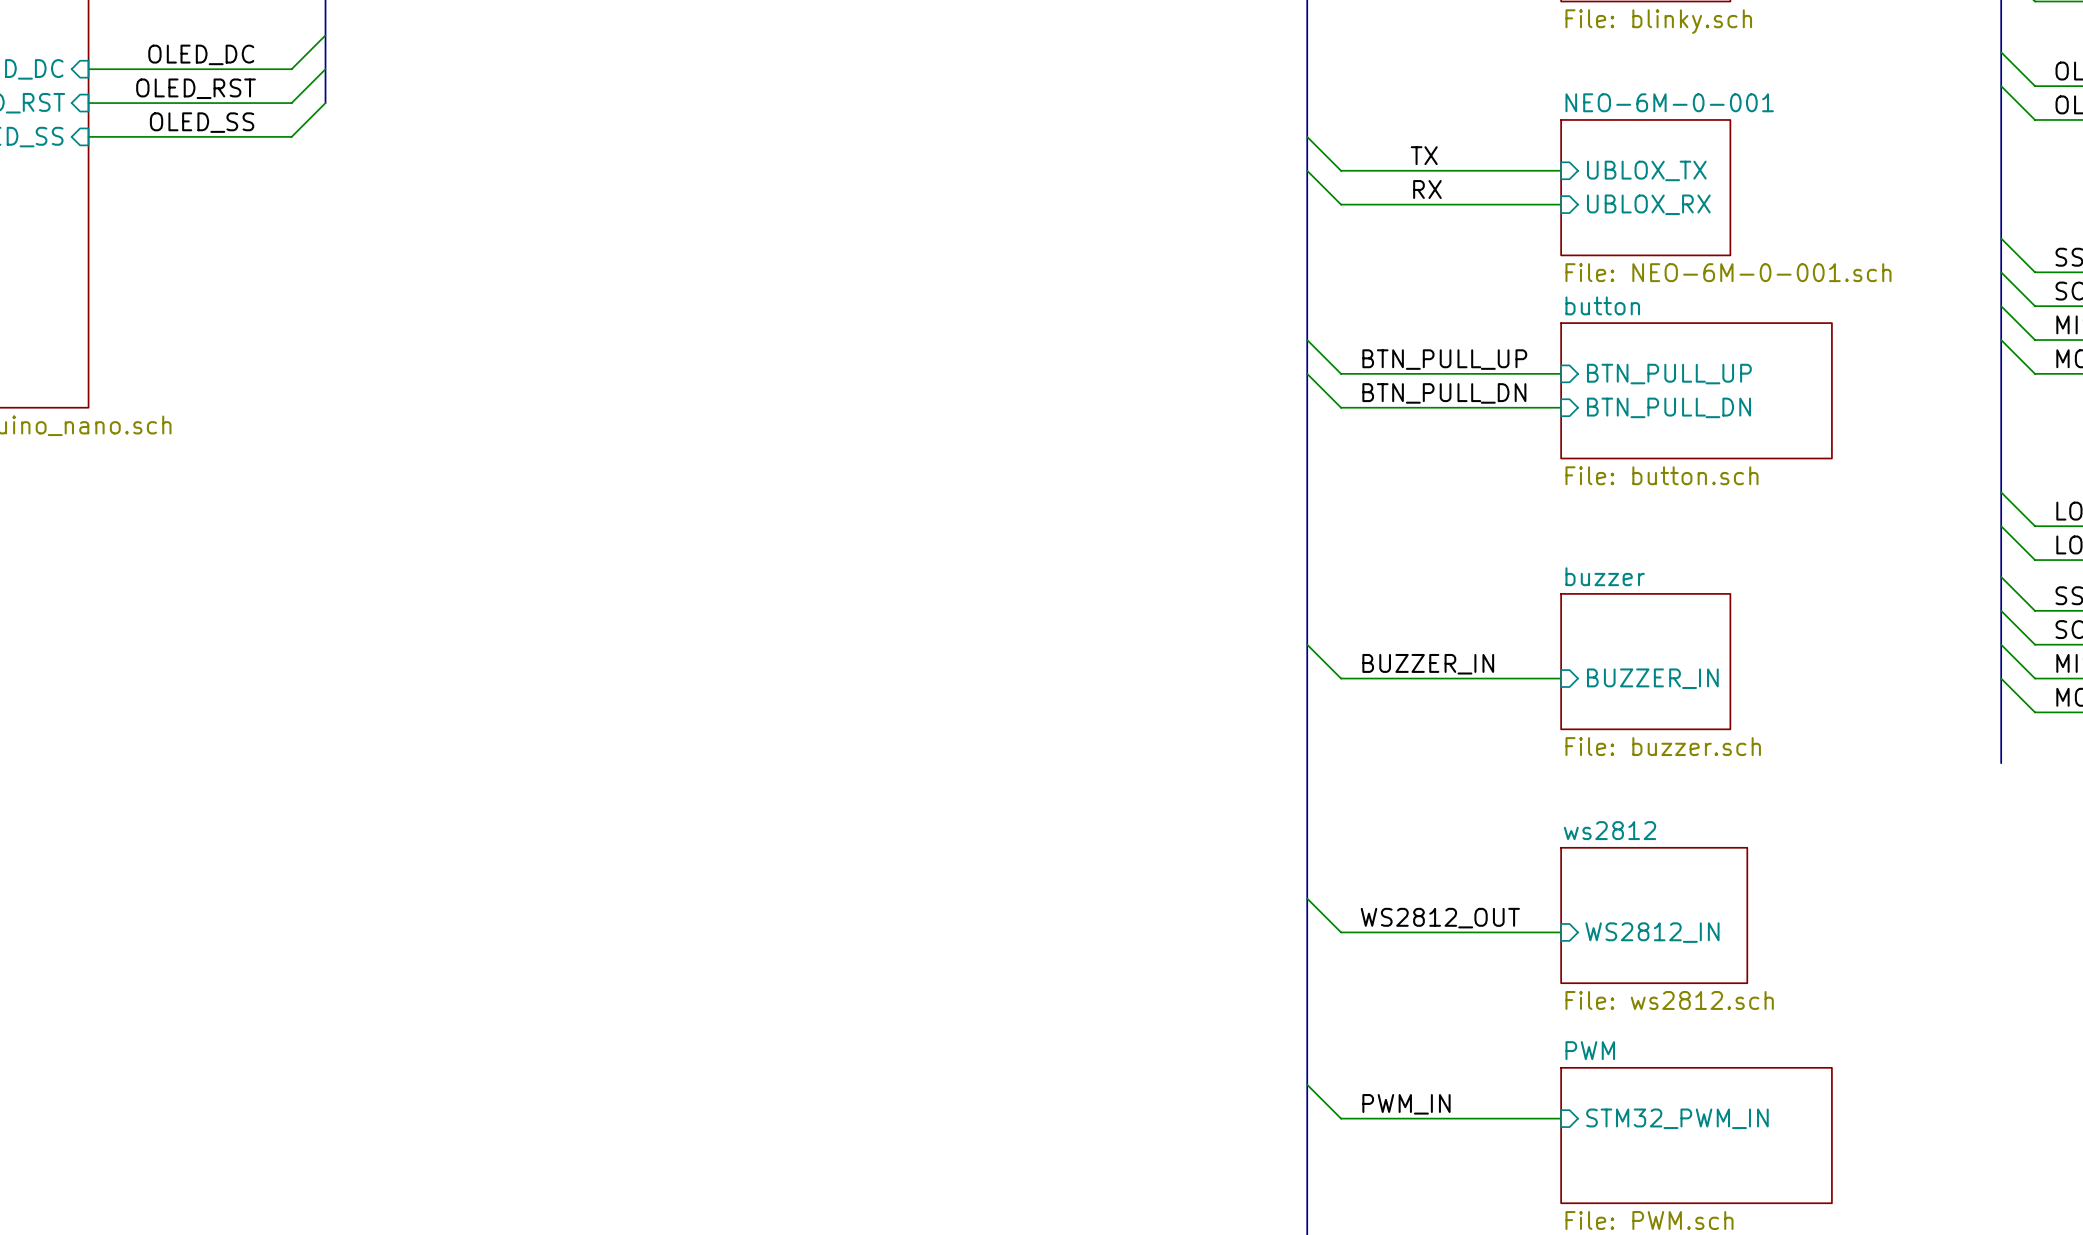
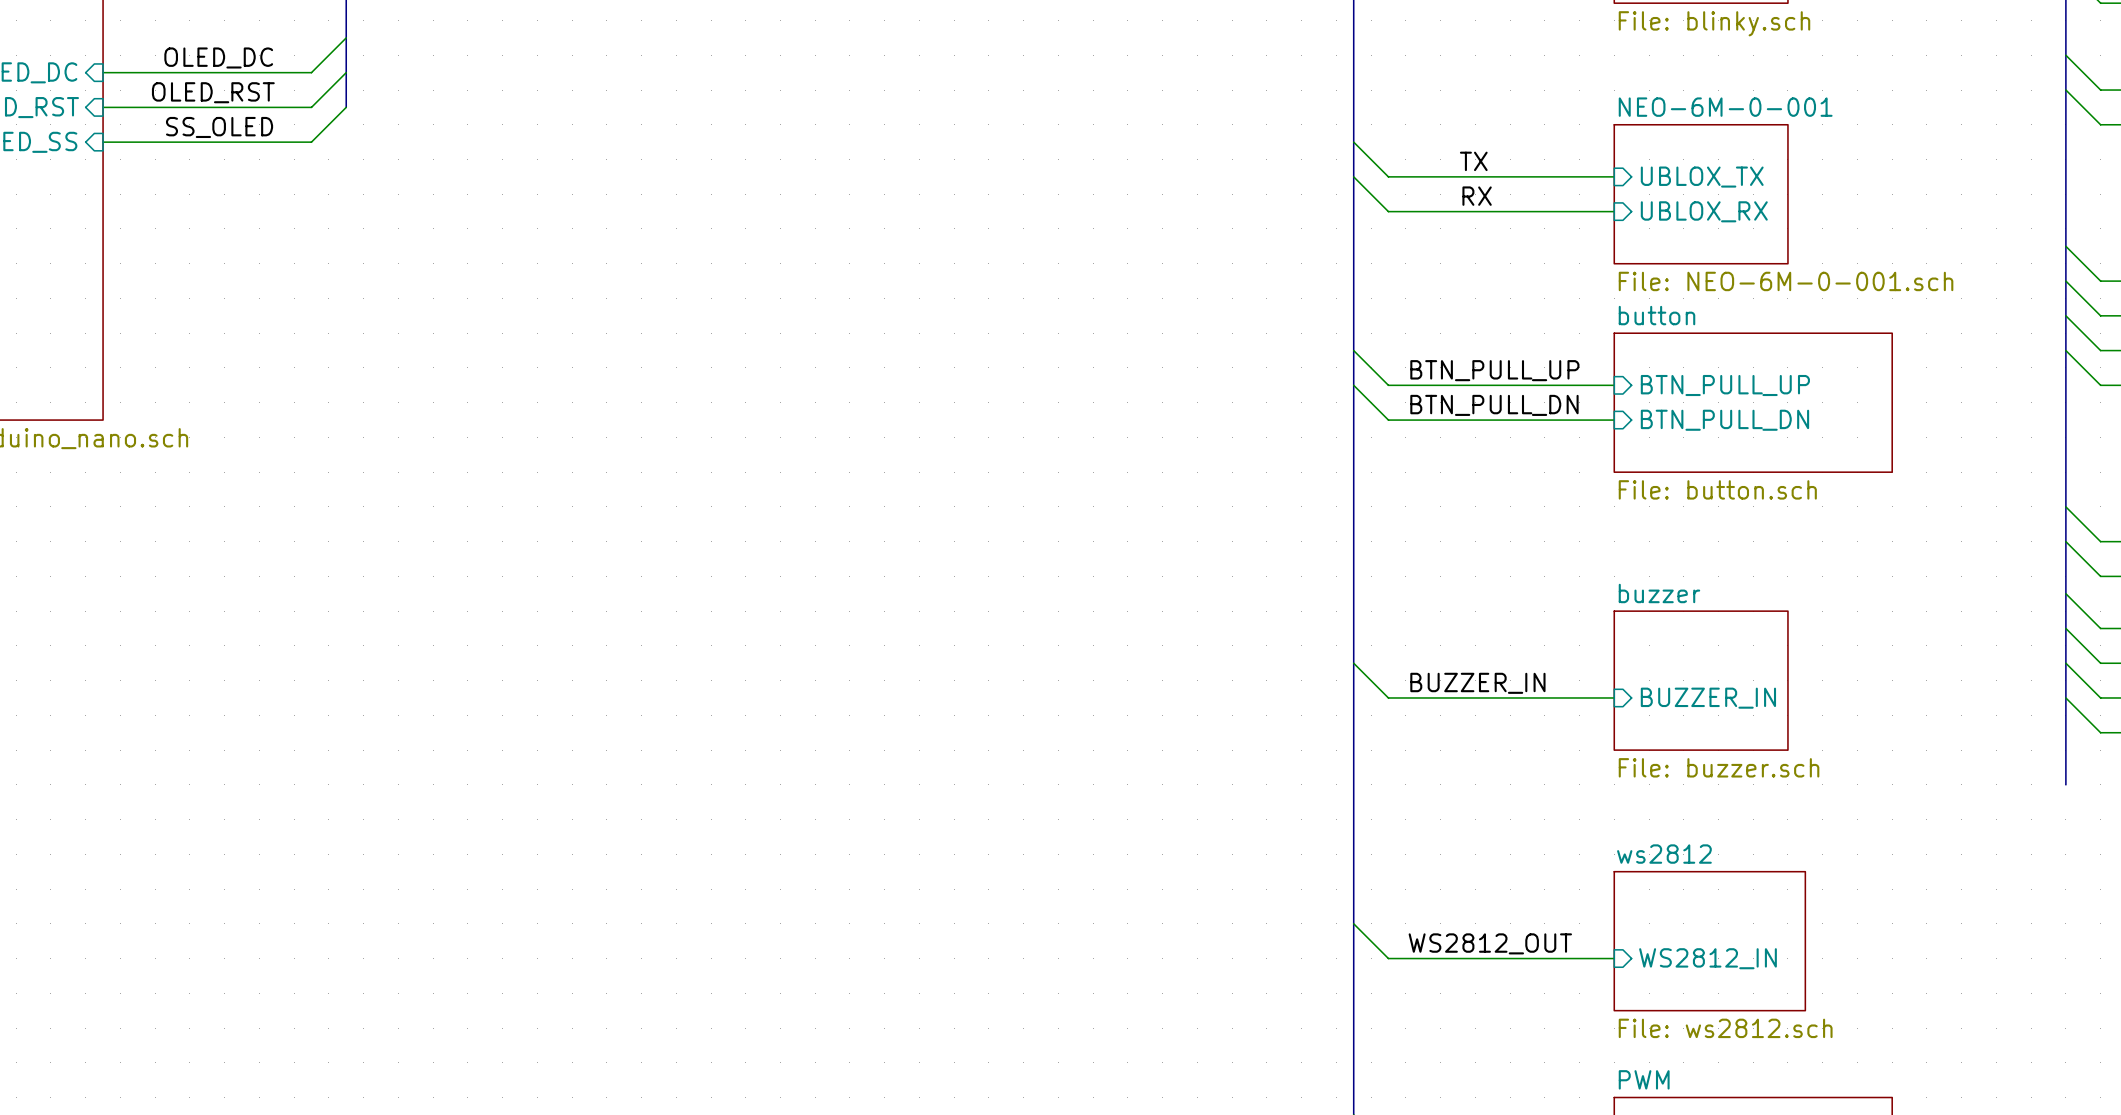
label: OLED_SS (202, 122) -> SS_OLED (219, 127)

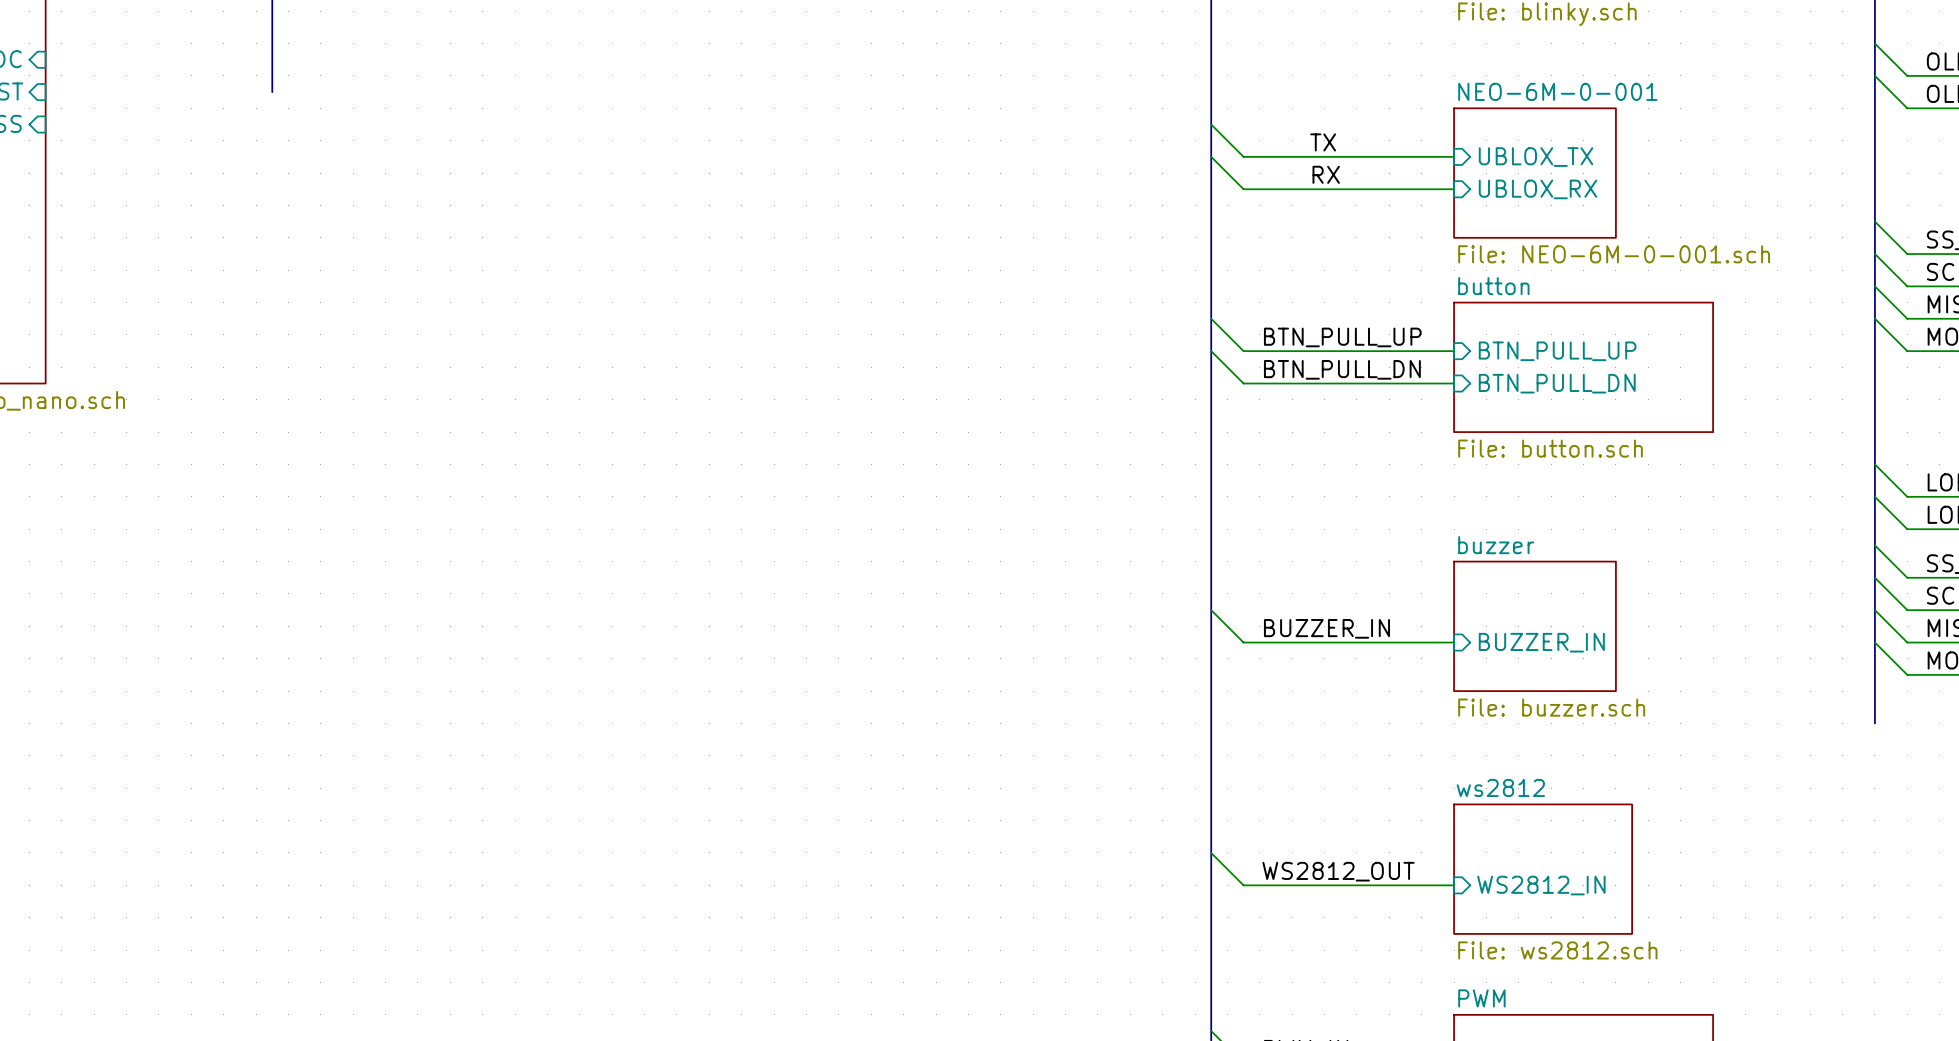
wire: (346, 37) (311, 72) (103, 72) -> none
label: OLED_DC (218, 57) -> none
wire: (346, 72) (311, 107) (103, 107) -> none
label: OLED_RST (213, 92) -> none
wire: (346, 107) (311, 142) (103, 142) -> none
label: SS_OLED (219, 127) -> none

